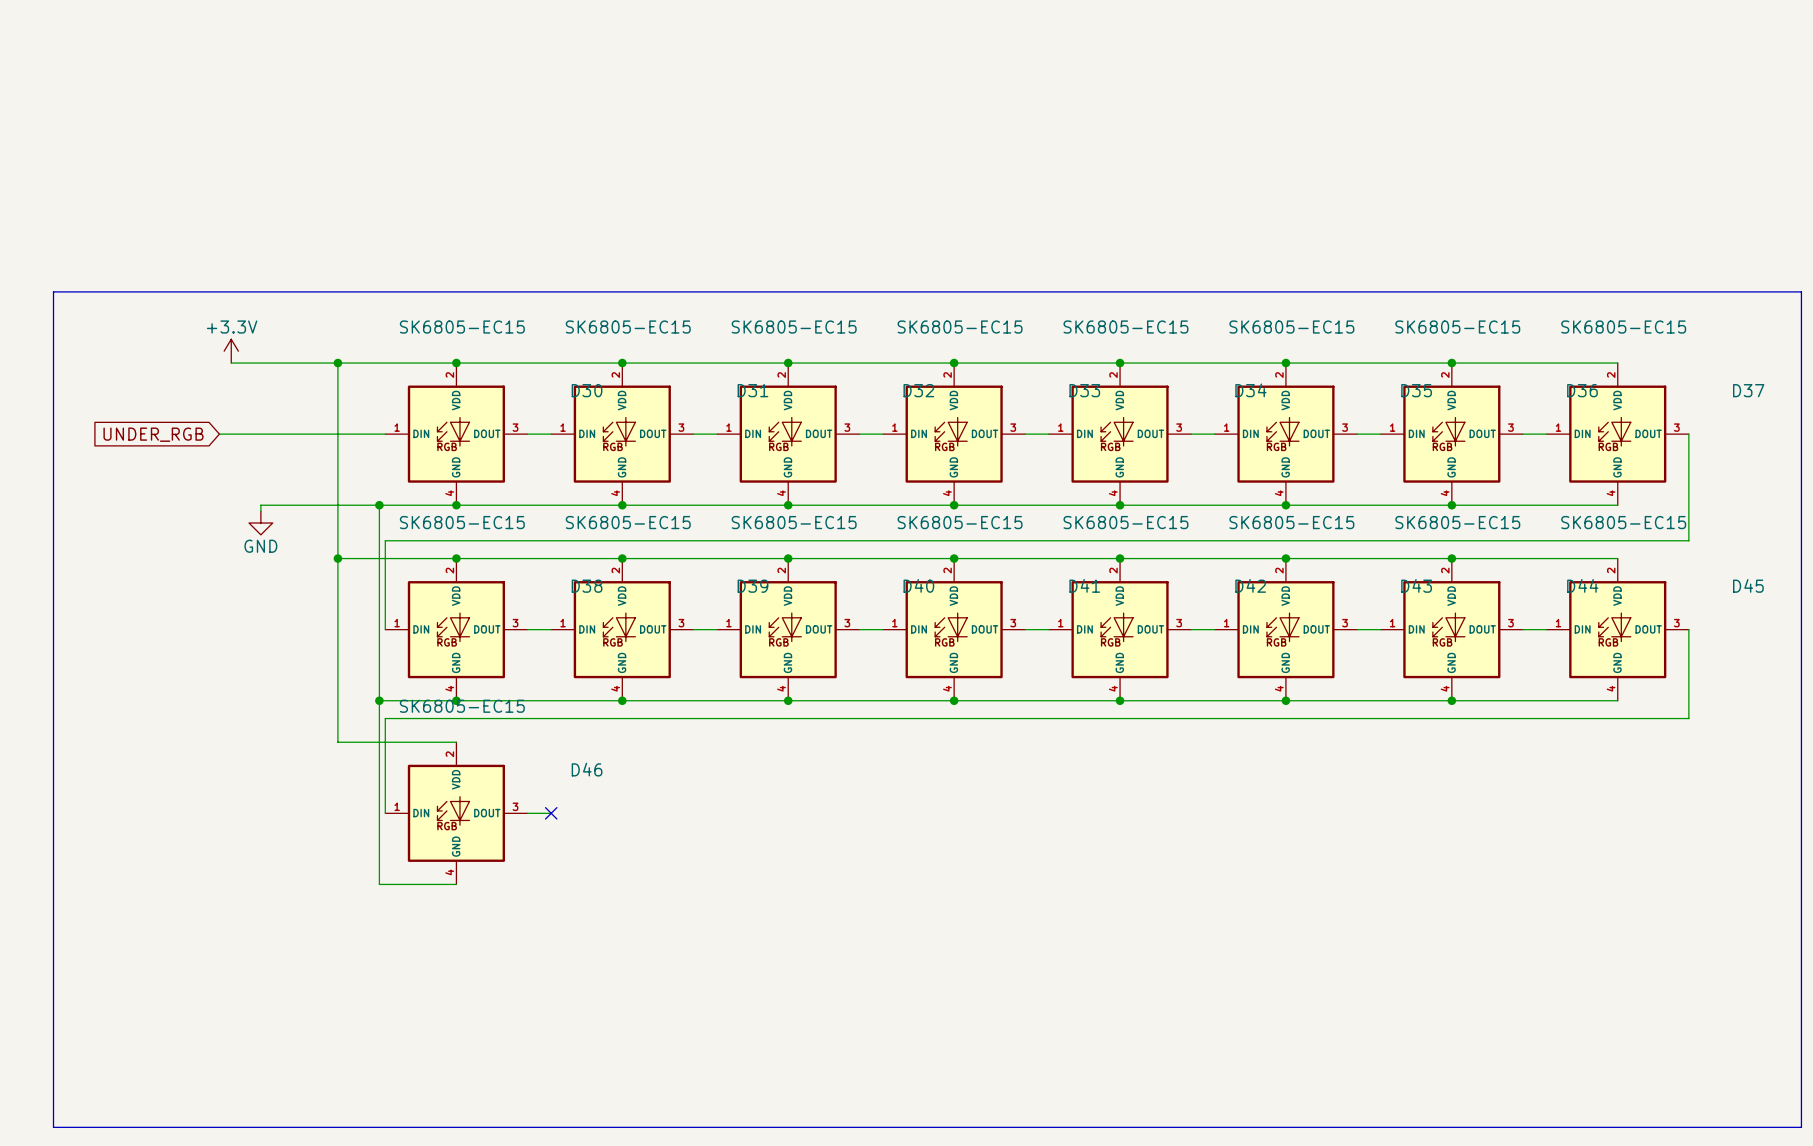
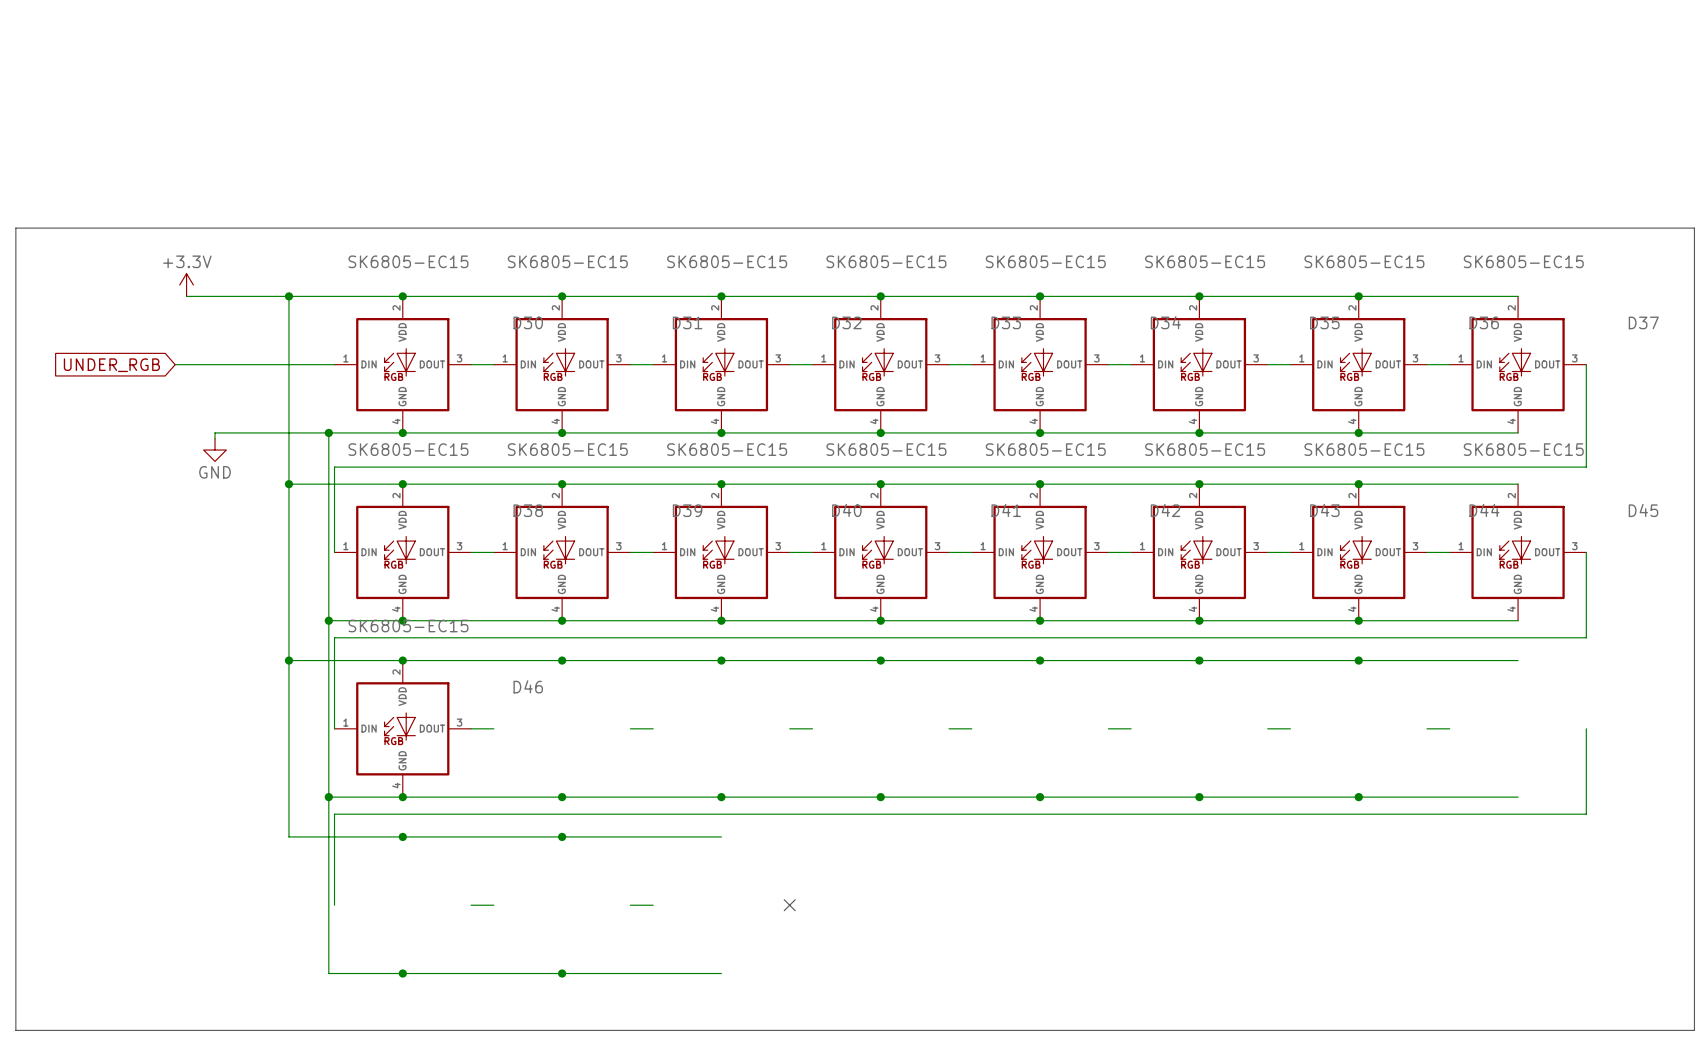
wire: none -> (288, 660) (288, 836) (721, 836)
junction: none -> (288, 660)
wire: none -> (402, 660) (1518, 660)
junction: none -> (402, 660)
junction: none -> (562, 660)
junction: none -> (721, 660)
junction: none -> (880, 660)
junction: none -> (1040, 660)
junction: none -> (1199, 660)
junction: none -> (1358, 660)
no-connect mark: (551, 813) -> none
wire: none -> (630, 728) (653, 728)
wire: none -> (789, 728) (812, 728)
wire: none -> (949, 728) (971, 728)
wire: none -> (1108, 728) (1131, 728)
wire: none -> (1267, 728) (1290, 728)
wire: none -> (1427, 728) (1449, 728)
wire: none -> (1586, 728) (1586, 814) (334, 814) (334, 905)
wire: none -> (328, 797) (328, 973) (721, 973)
junction: none -> (328, 797)
wire: none -> (402, 797) (1518, 797)
junction: none -> (402, 797)
junction: none -> (562, 797)
junction: none -> (721, 797)
junction: none -> (880, 797)
junction: none -> (1040, 797)
junction: none -> (1199, 797)
junction: none -> (1358, 797)
junction: none -> (402, 836)
junction: none -> (562, 836)
wire: none -> (471, 905) (493, 905)
wire: none -> (630, 905) (653, 905)
no-connect mark: none -> (789, 905)
junction: none -> (402, 973)
junction: none -> (562, 973)

